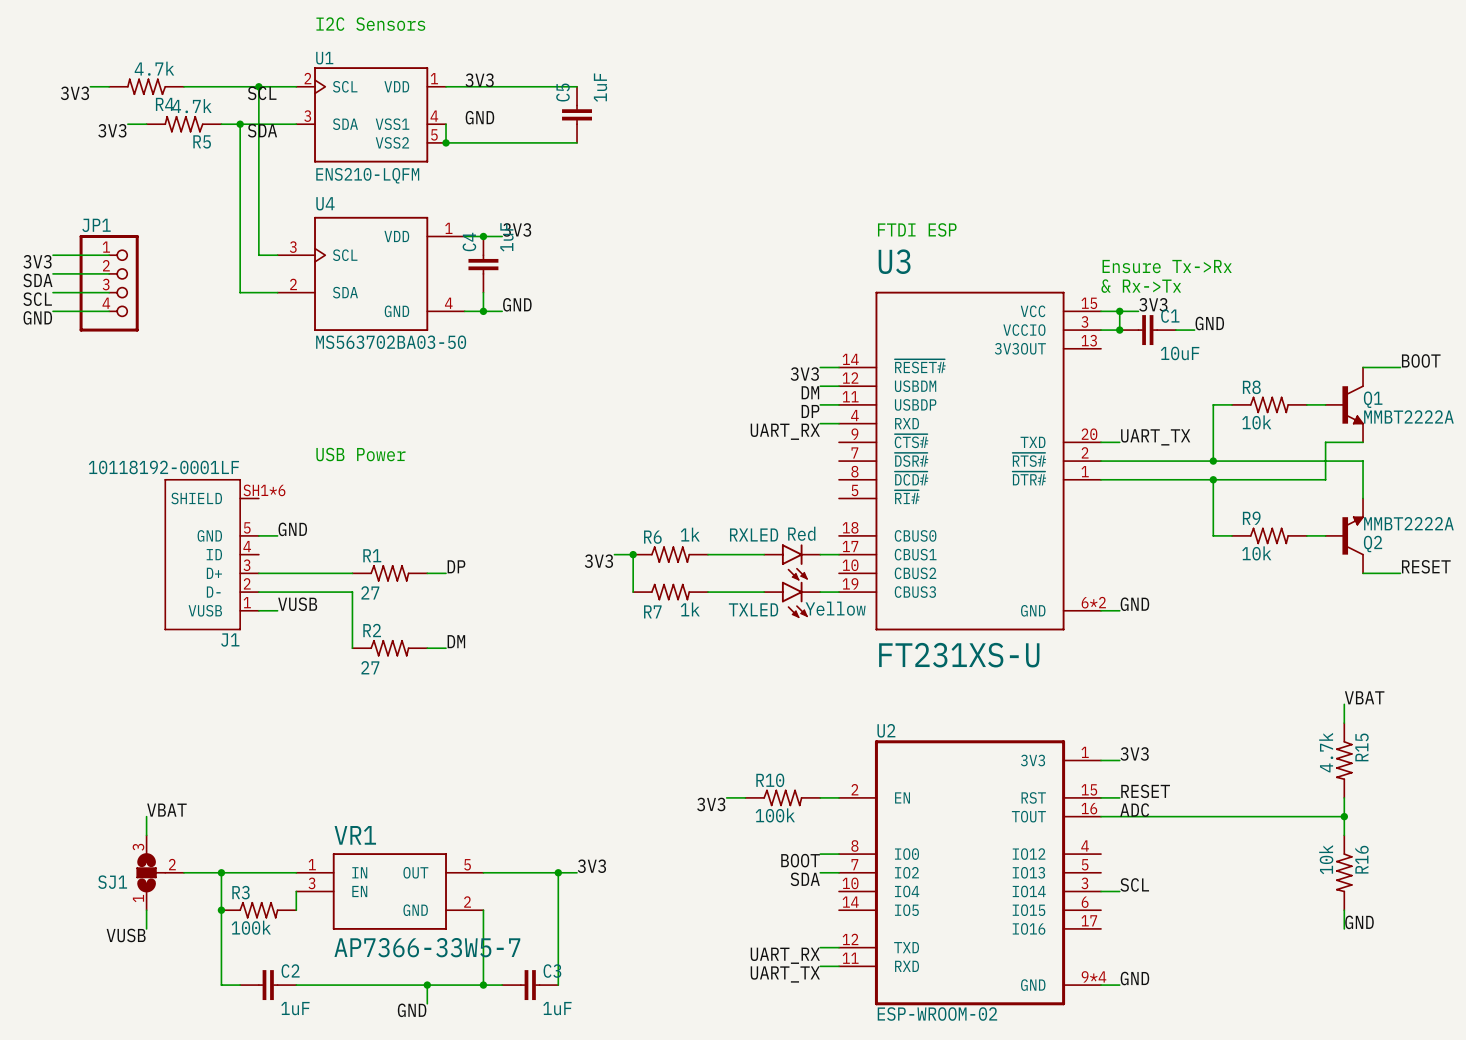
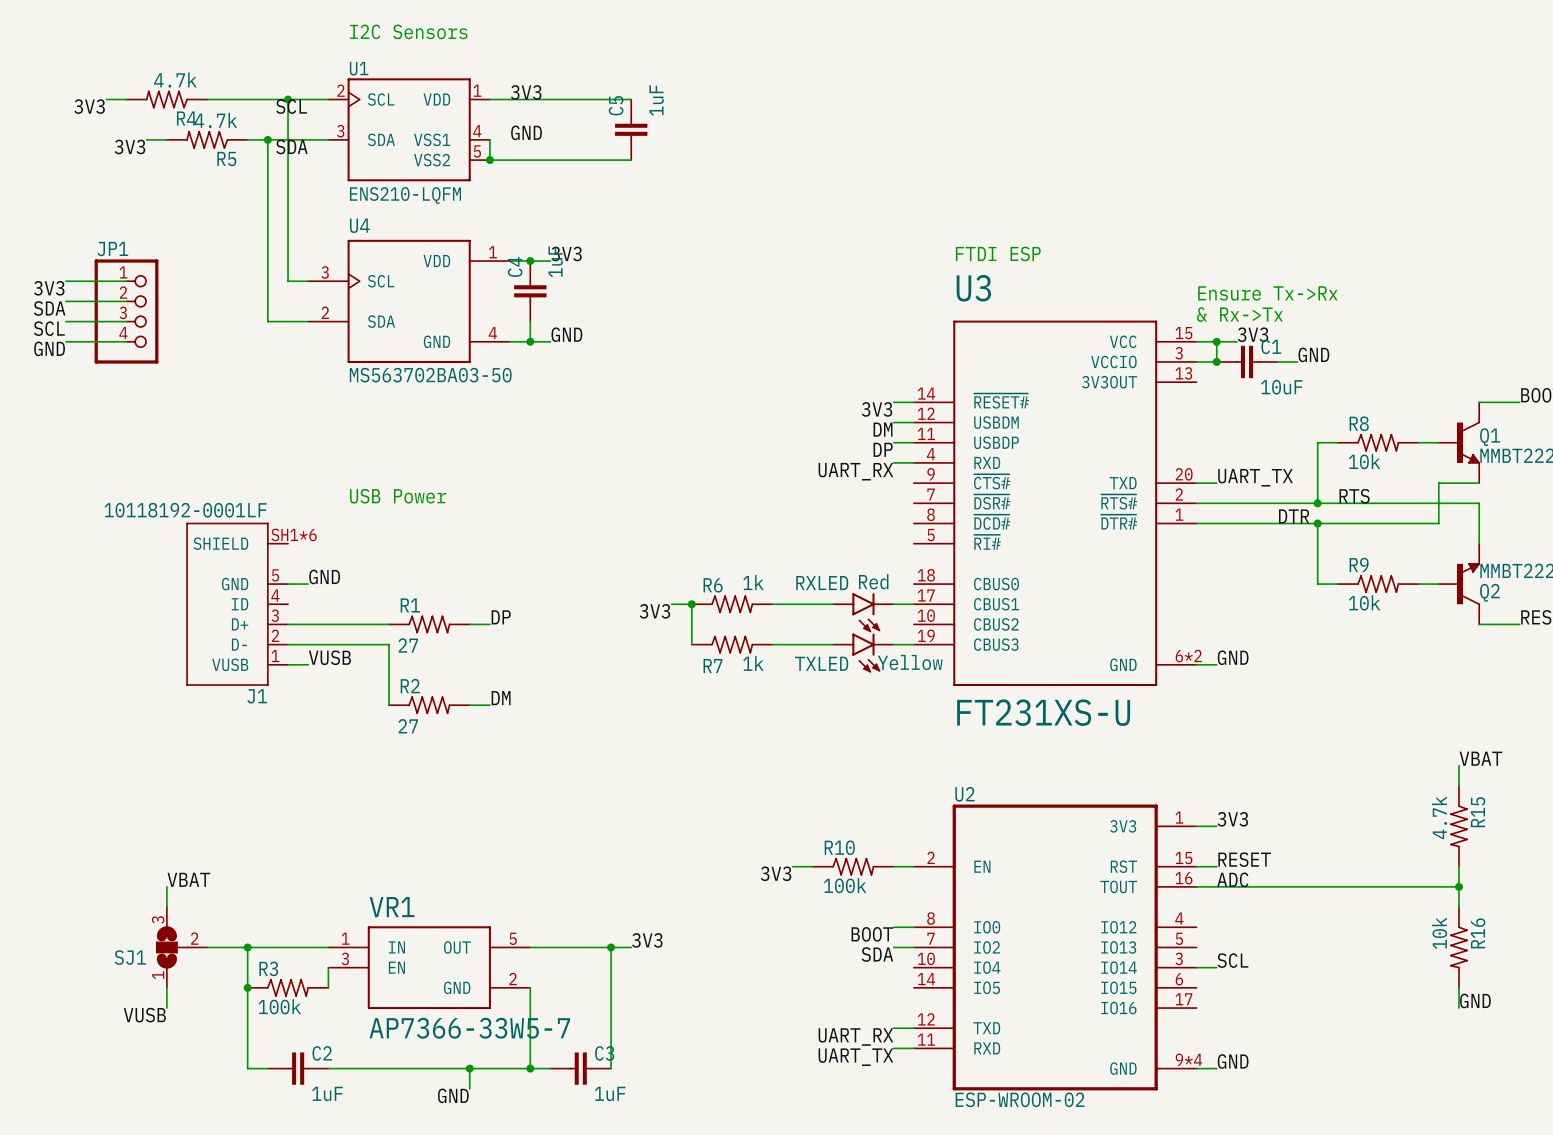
label: none -> RTS (1354, 496)
label: none -> DTR (1294, 516)

